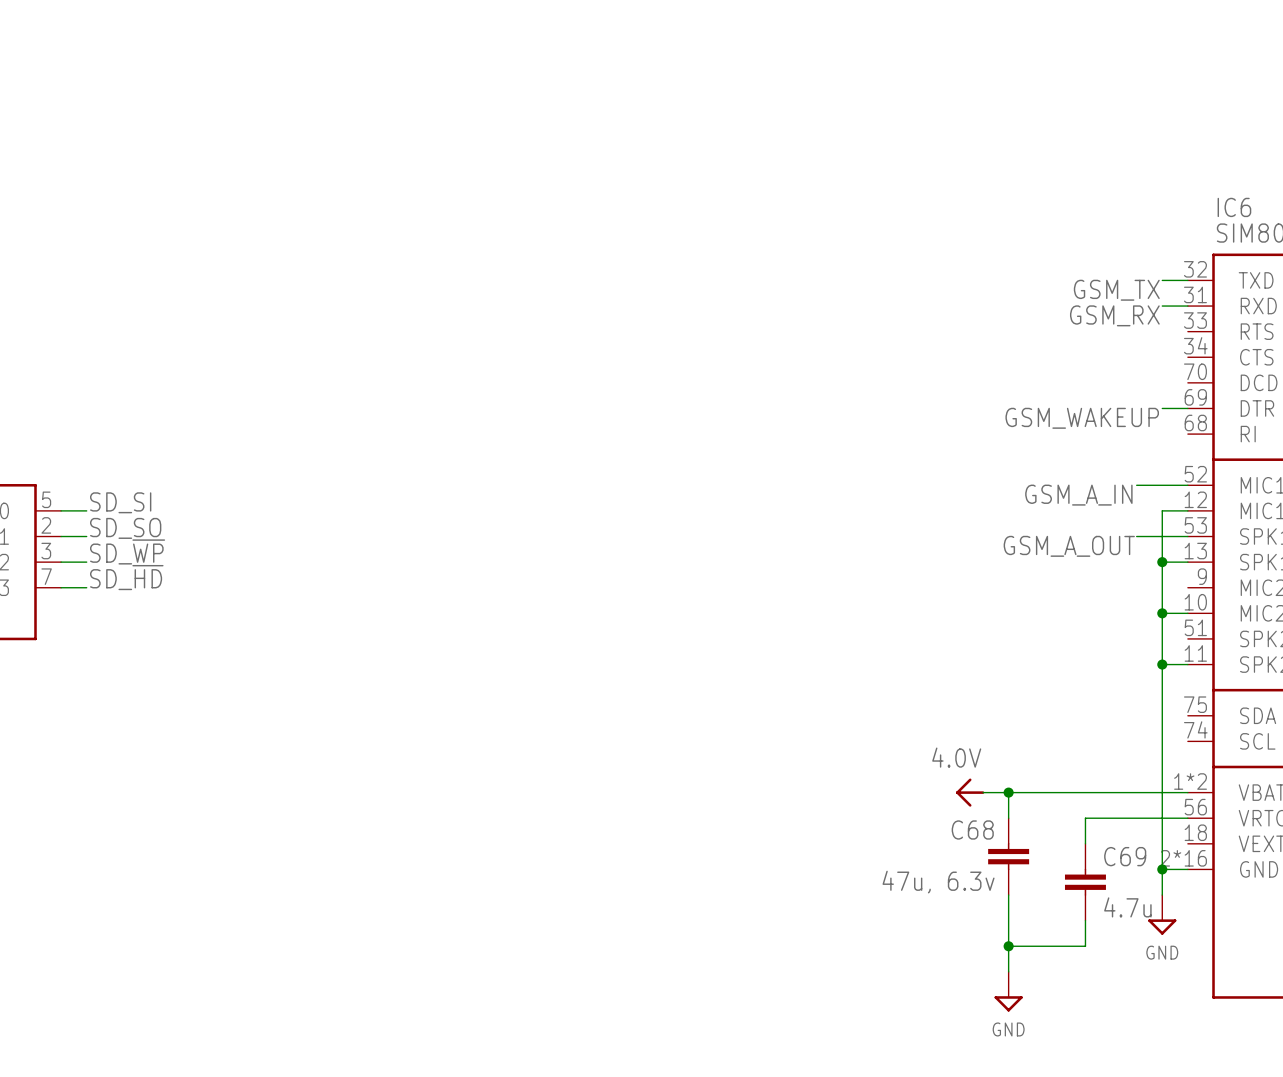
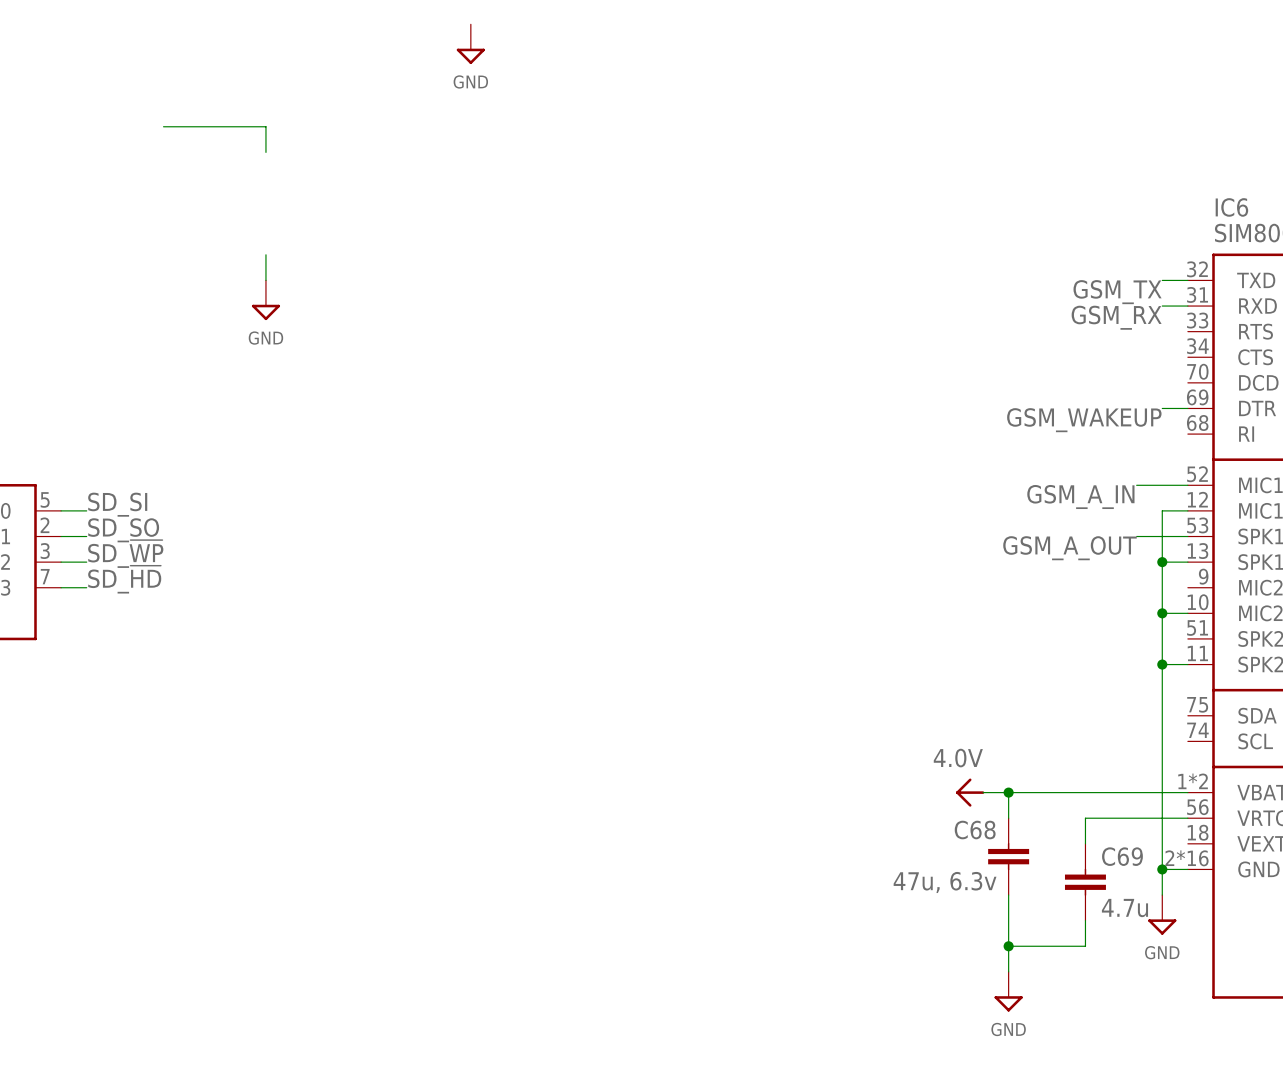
power symbol: none -> GND (470, 44)
wire: none -> (163, 126) (265, 126) (265, 152)
wire: none -> (265, 254) (265, 280)
power symbol: none -> GND (265, 300)

